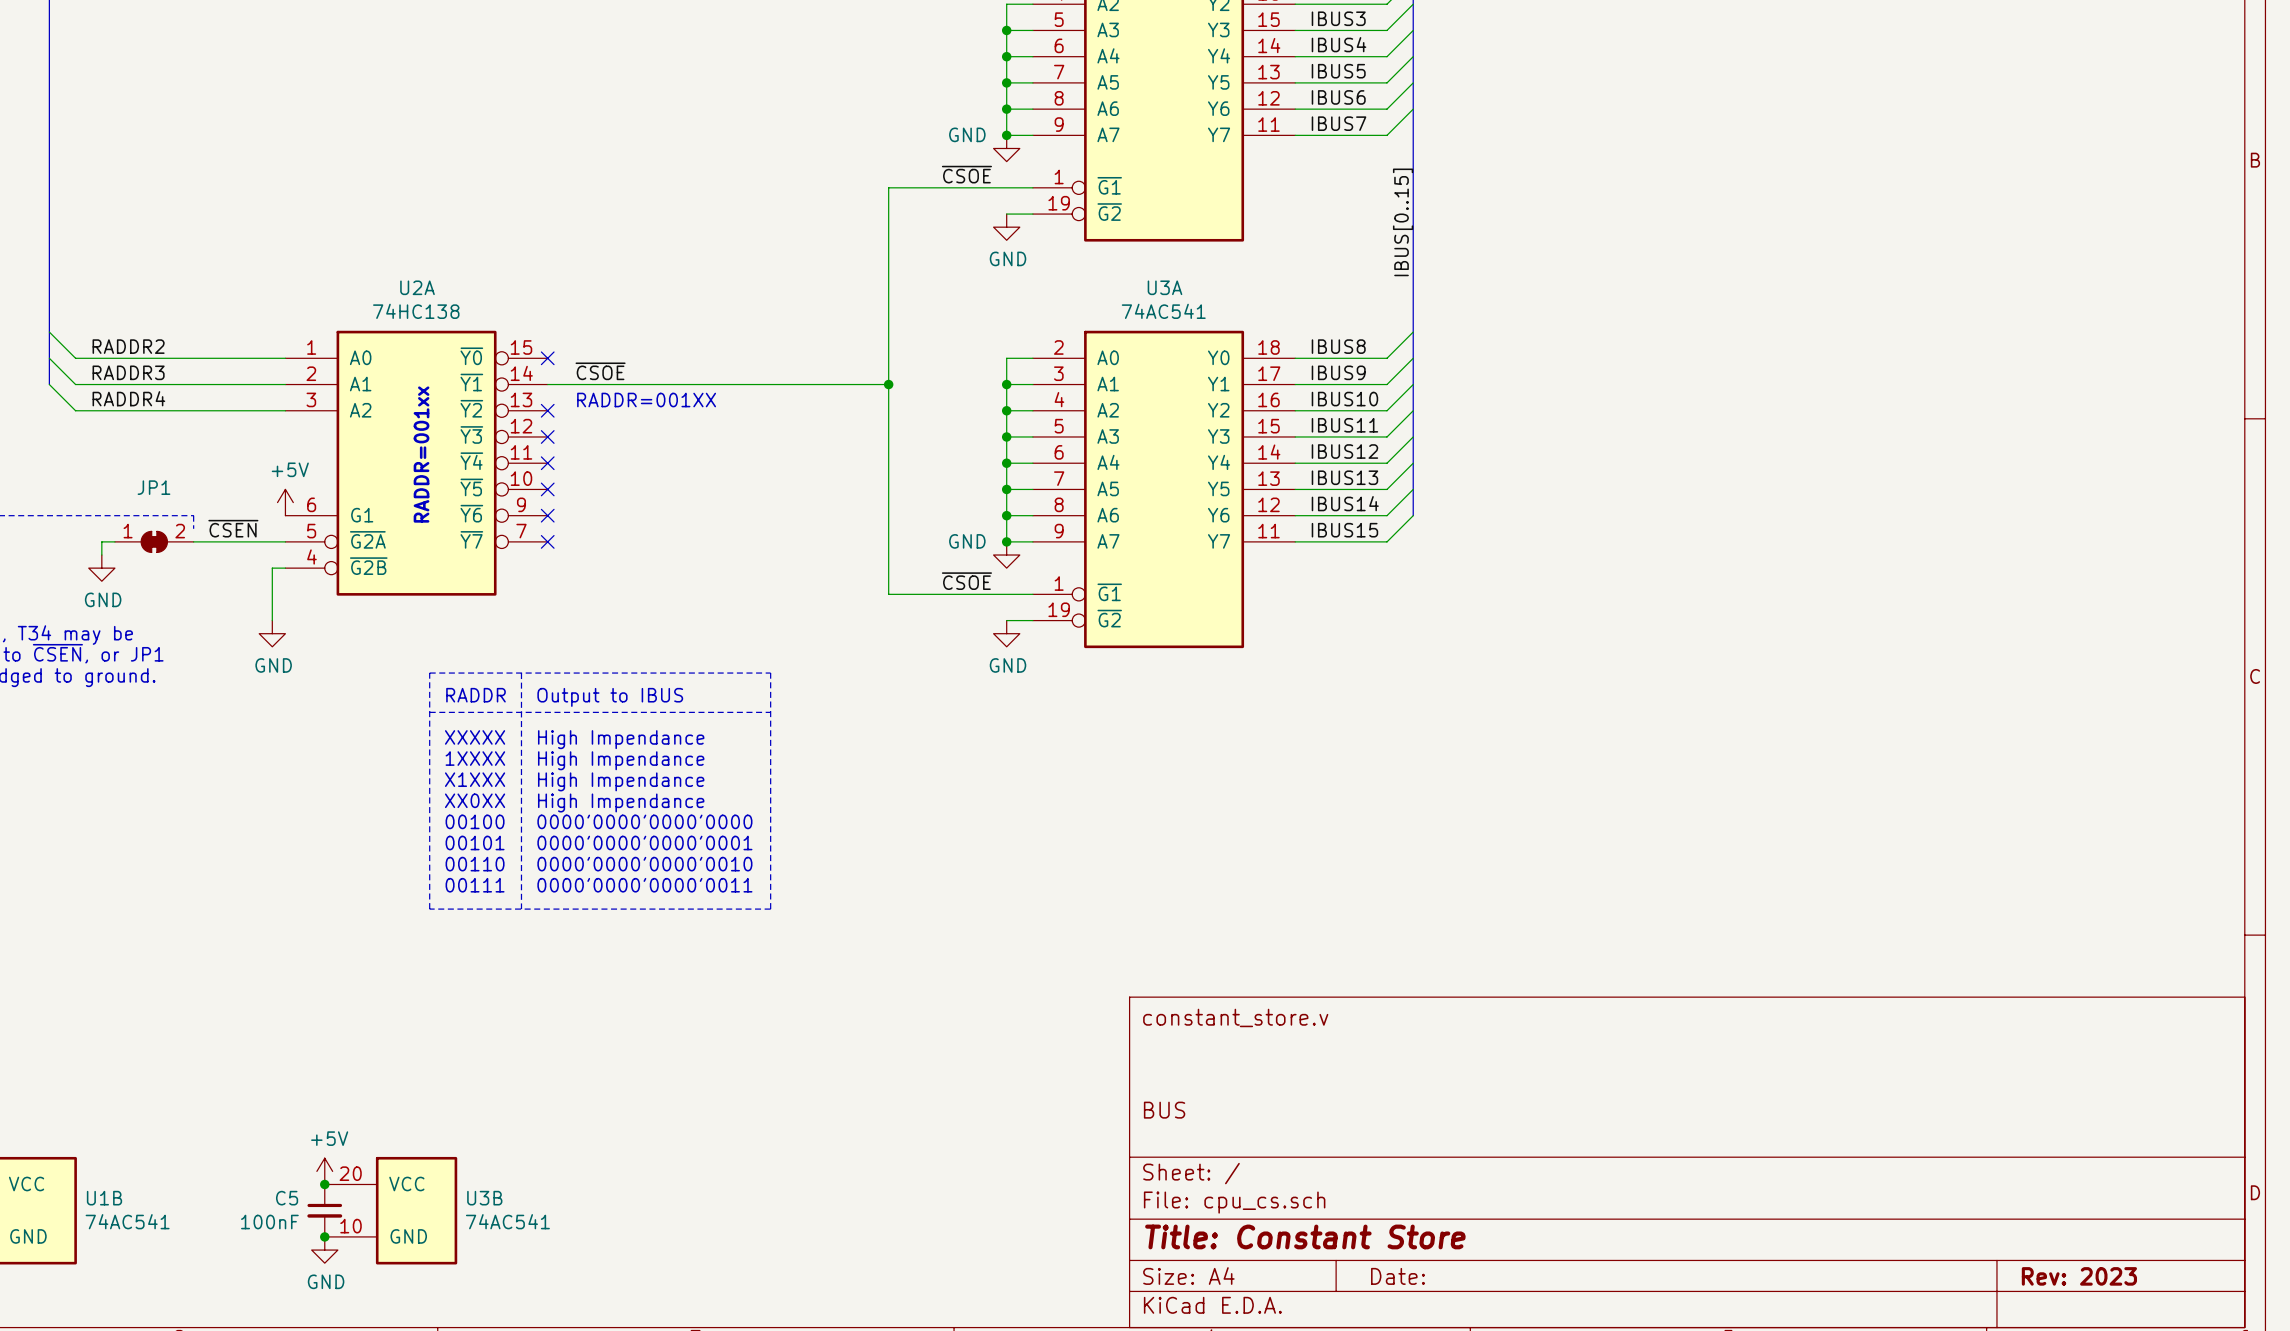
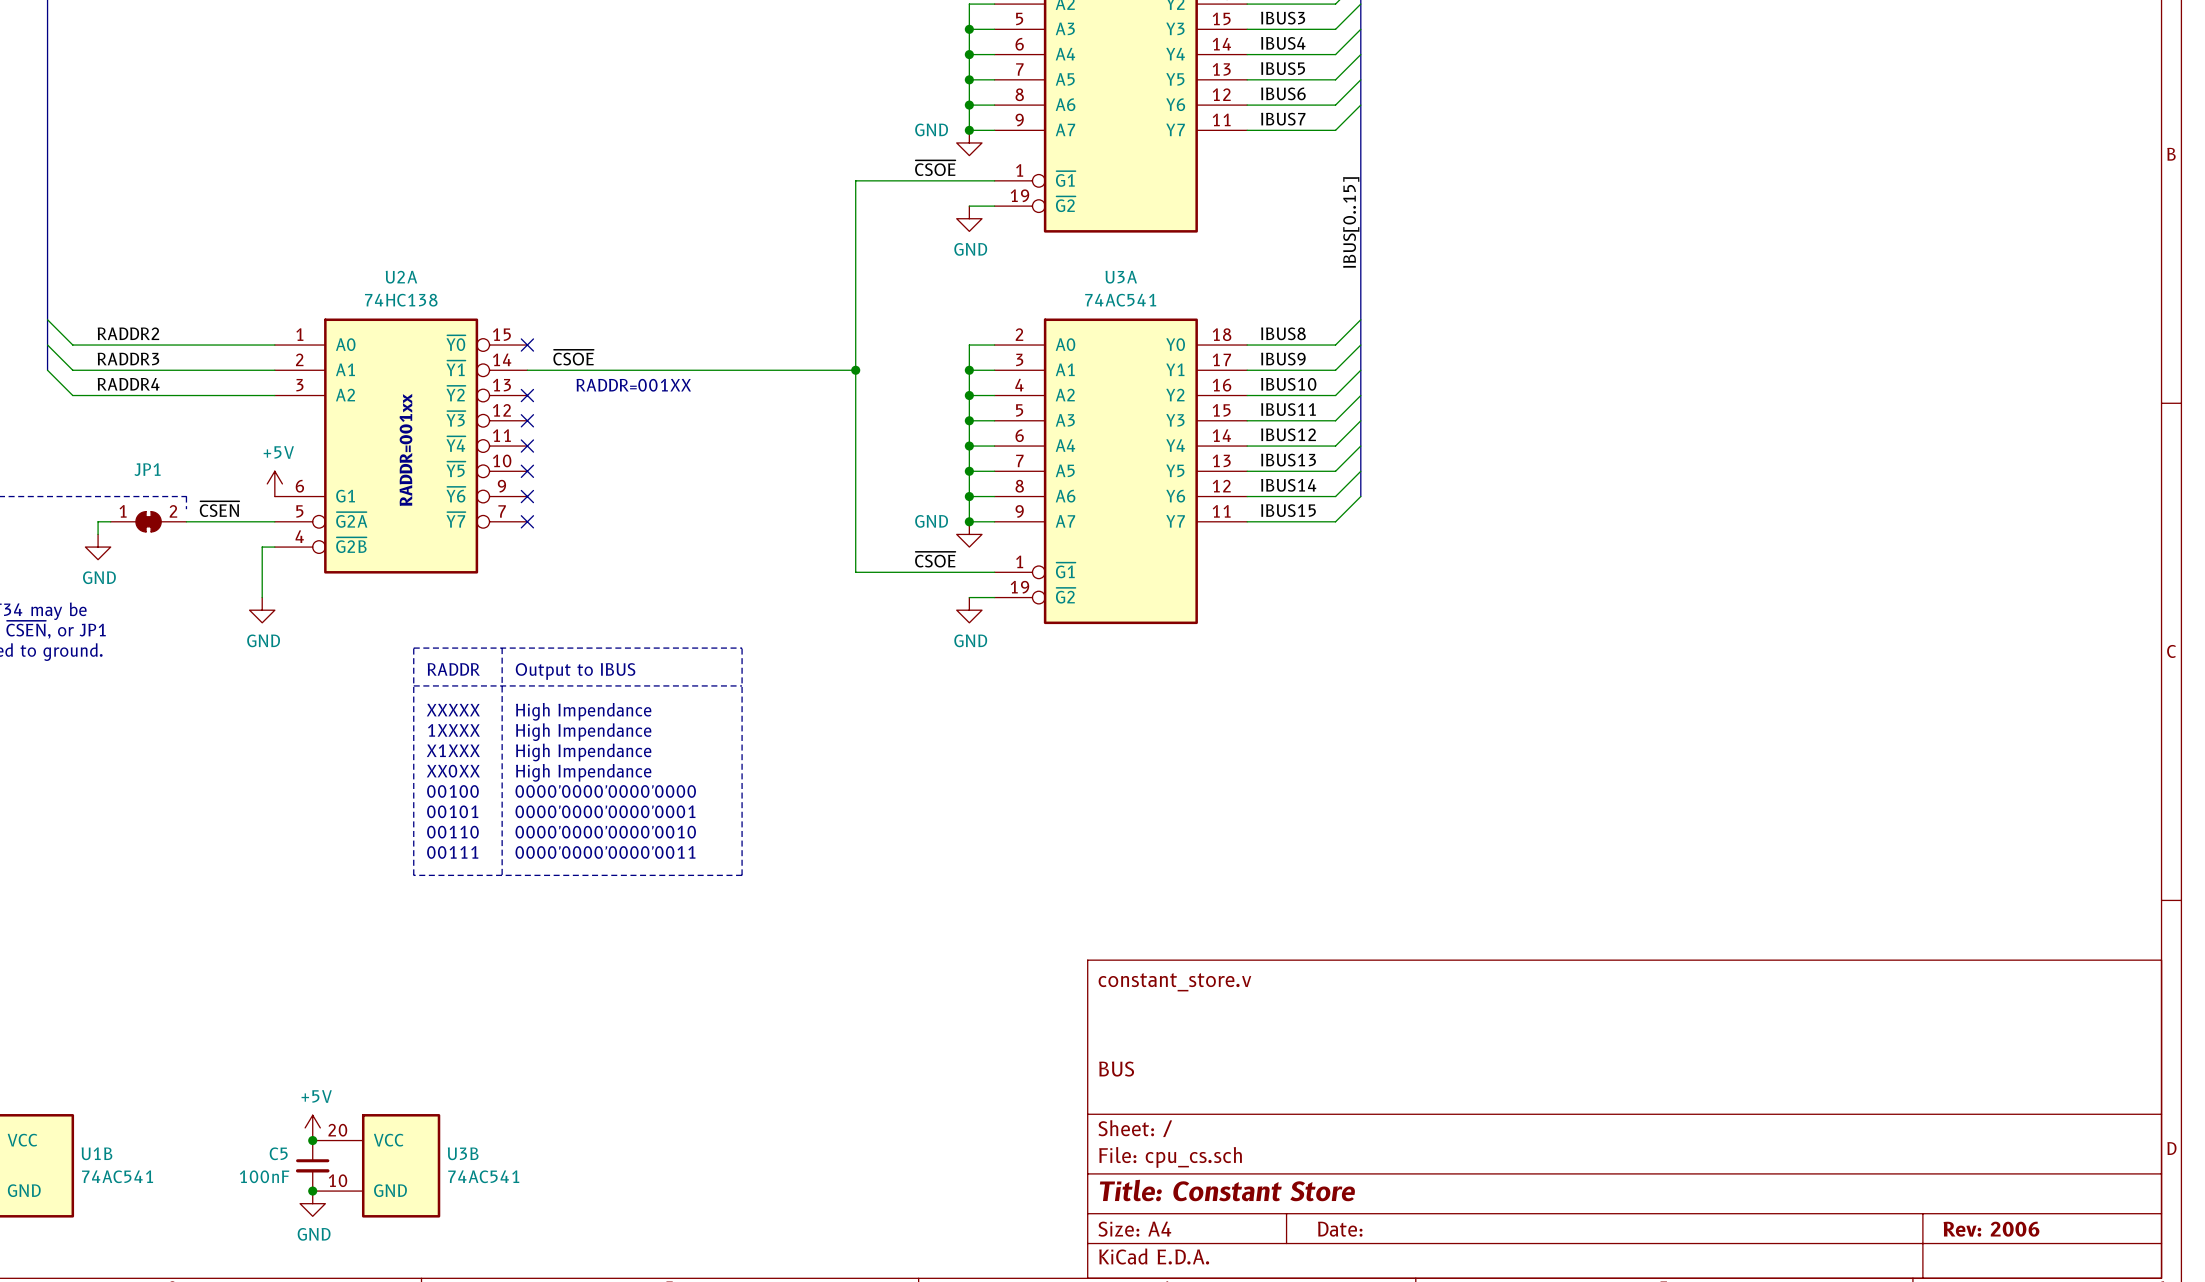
title block: Rev: 2023 (2079, 1276) -> Rev: 2006 (1991, 1229)

